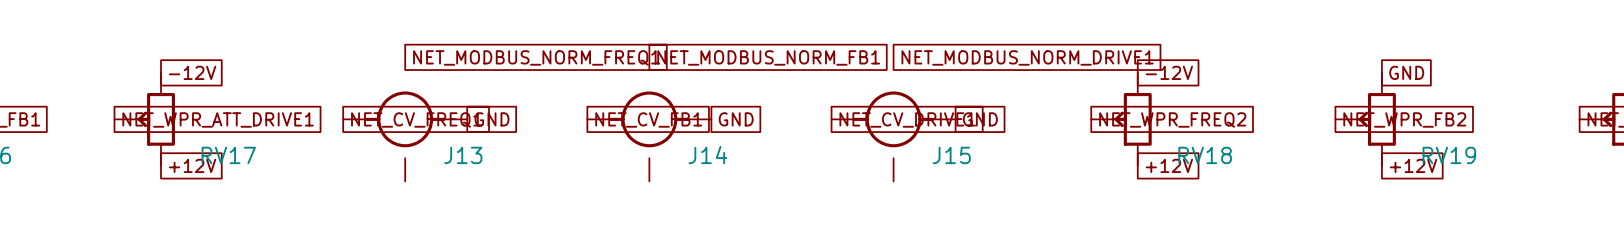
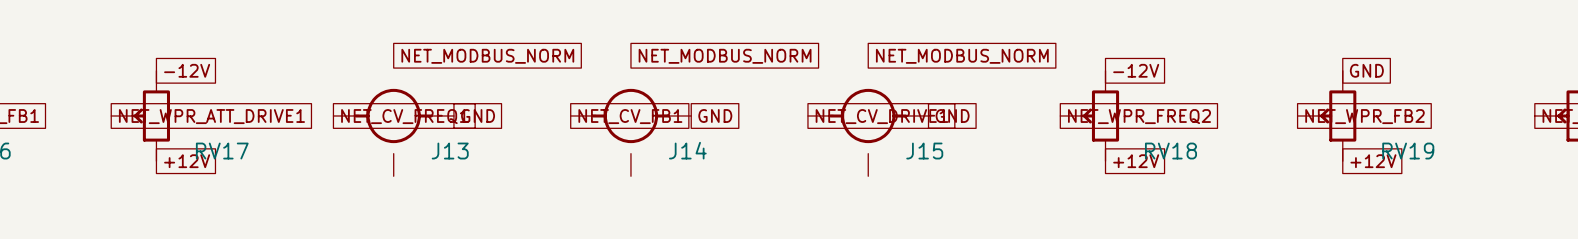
global label: NET_MODBUS_NORM_FREQ1 (536, 57) -> NET_MODBUS_NORM (487, 56)
global label: NET_MODBUS_NORM_FB1 (768, 57) -> NET_MODBUS_NORM (725, 56)
global label: NET_MODBUS_NORM_DRIVE1 (1027, 57) -> NET_MODBUS_NORM (962, 56)

